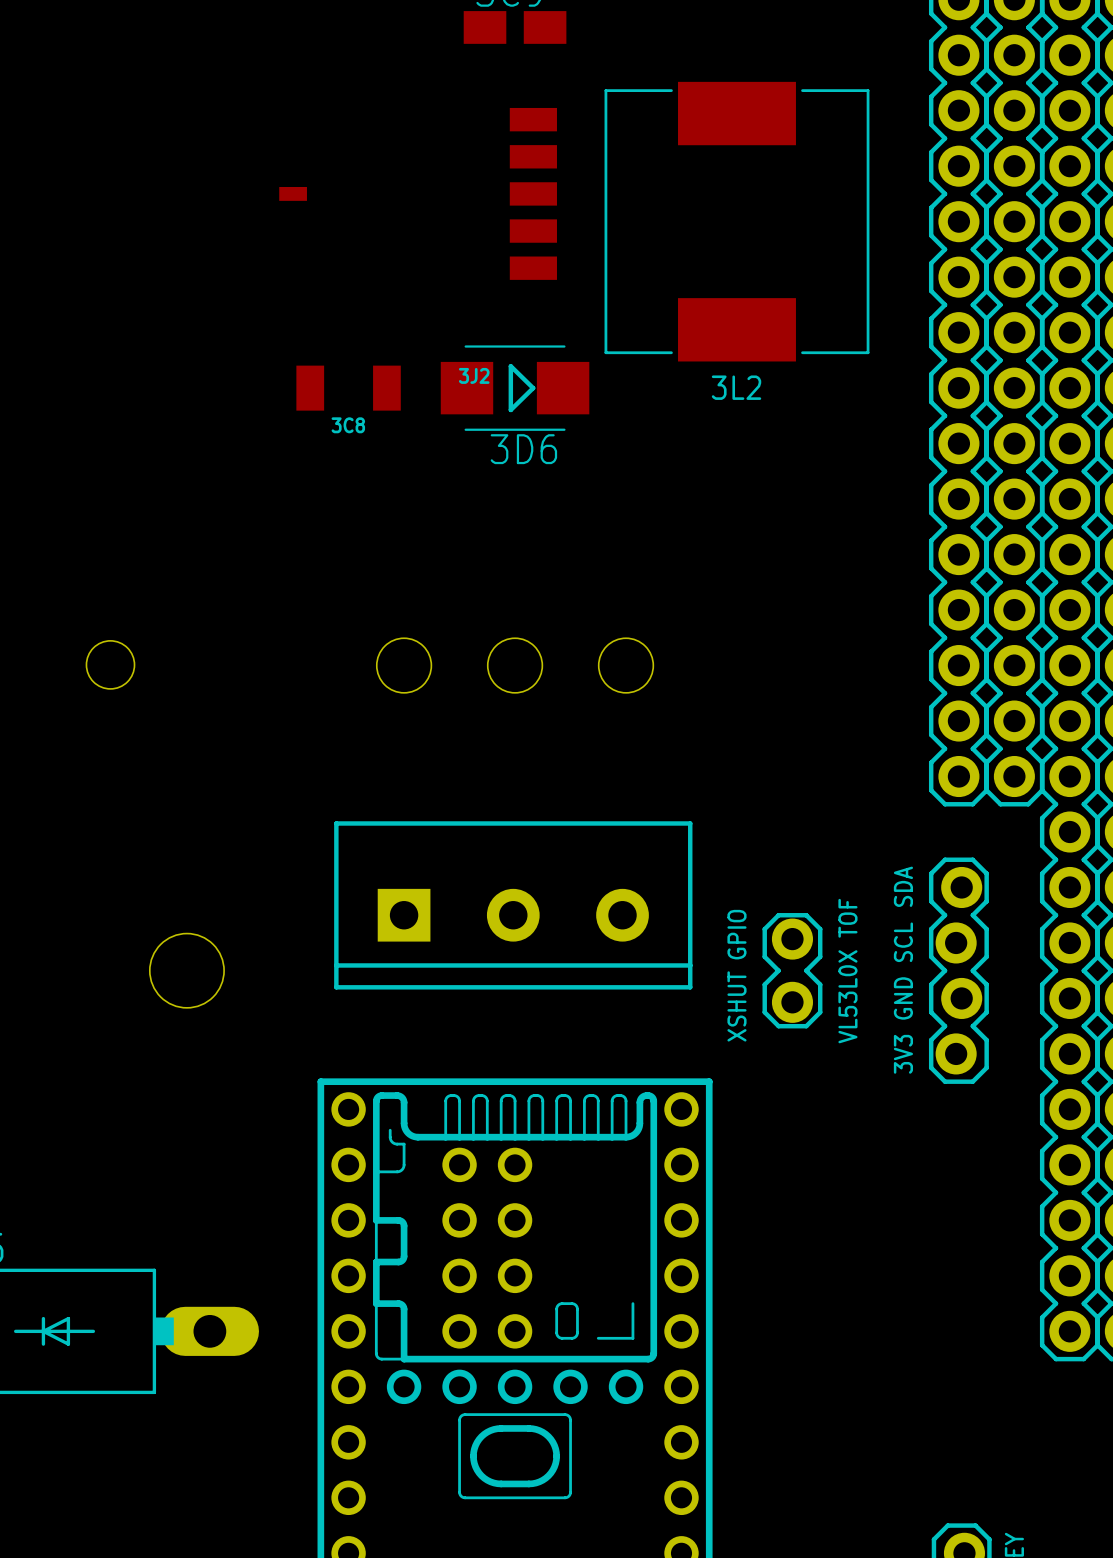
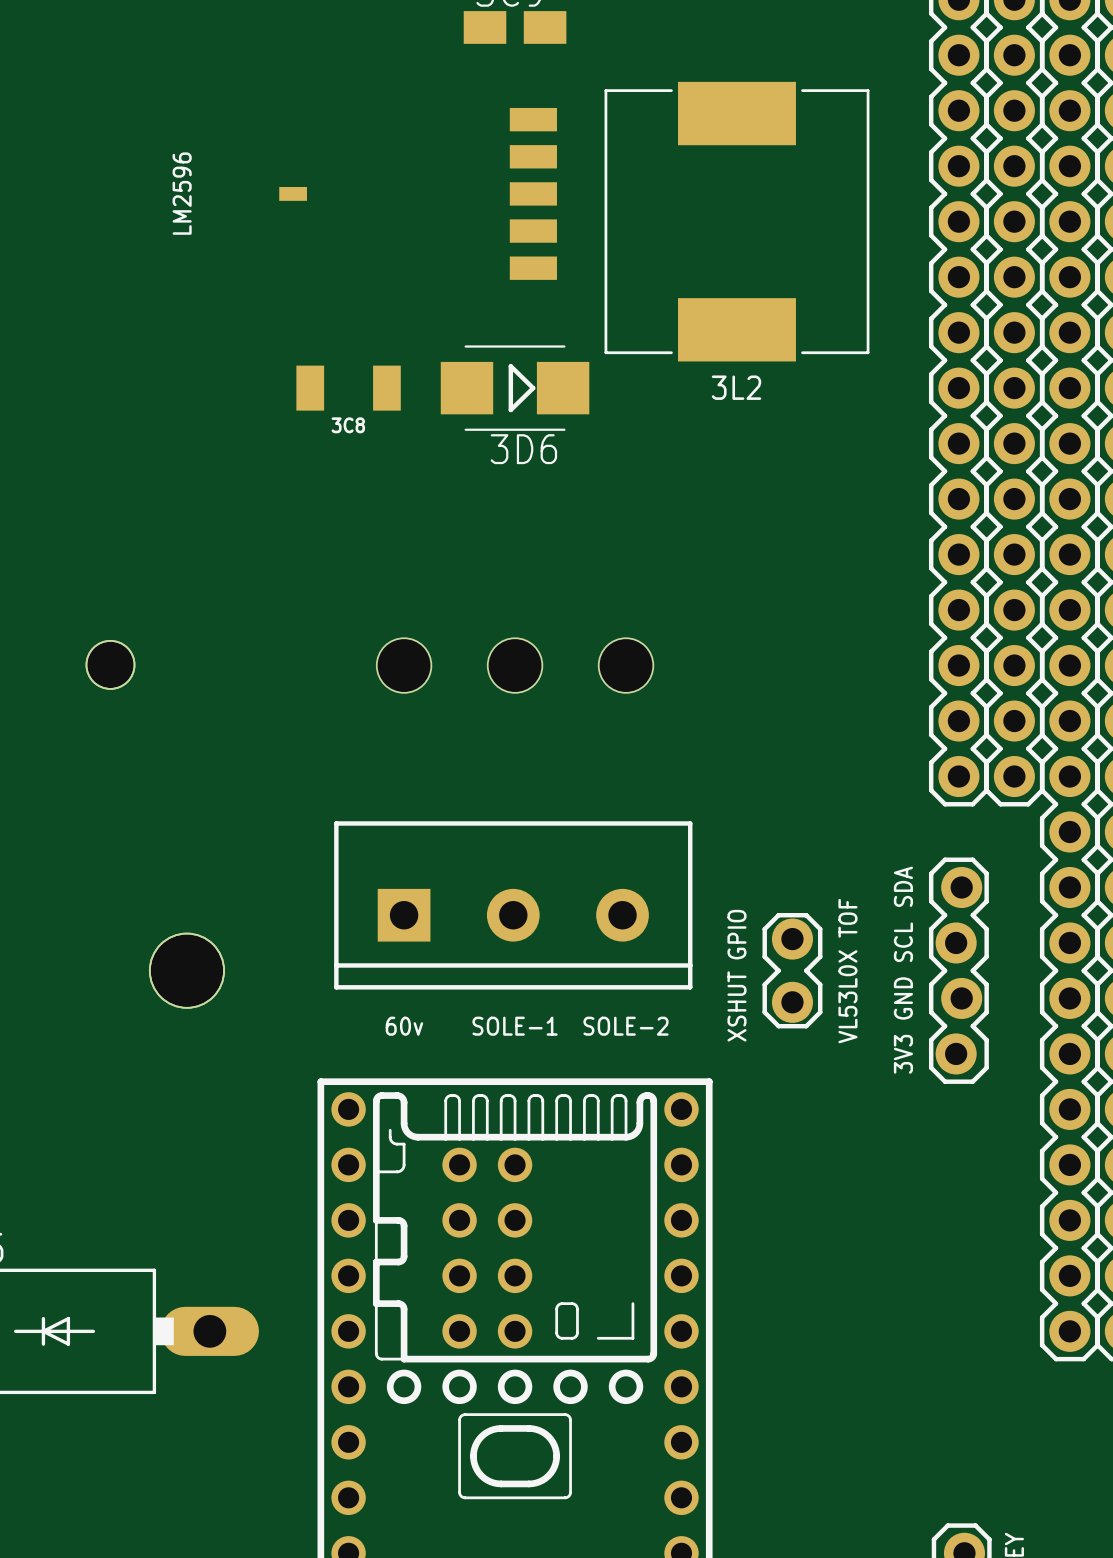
text: none -> LM2596 (182, 193)
3J2 name: 3J2 (474, 375) -> none
hole: none -> (110, 664)
hole: none -> (186, 970)
text: none -> 60v (404, 1026)
text: none -> SOLE-1 (515, 1026)
text: none -> SOLE-2 (626, 1026)

